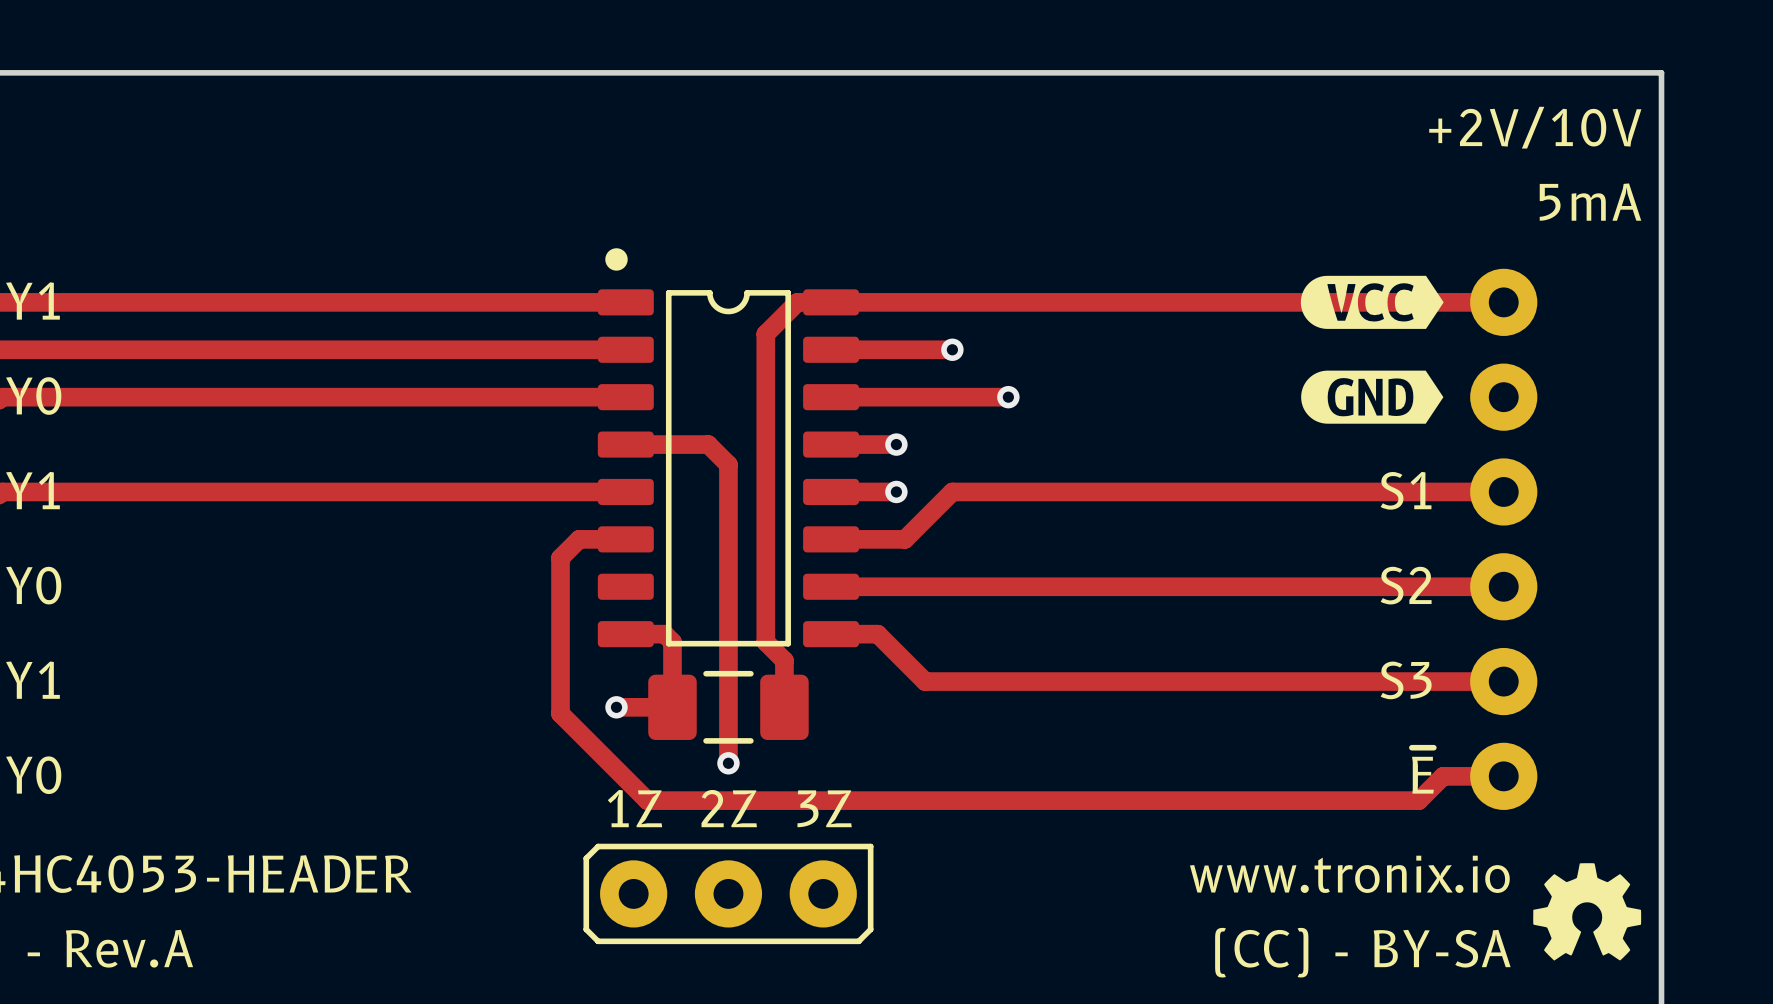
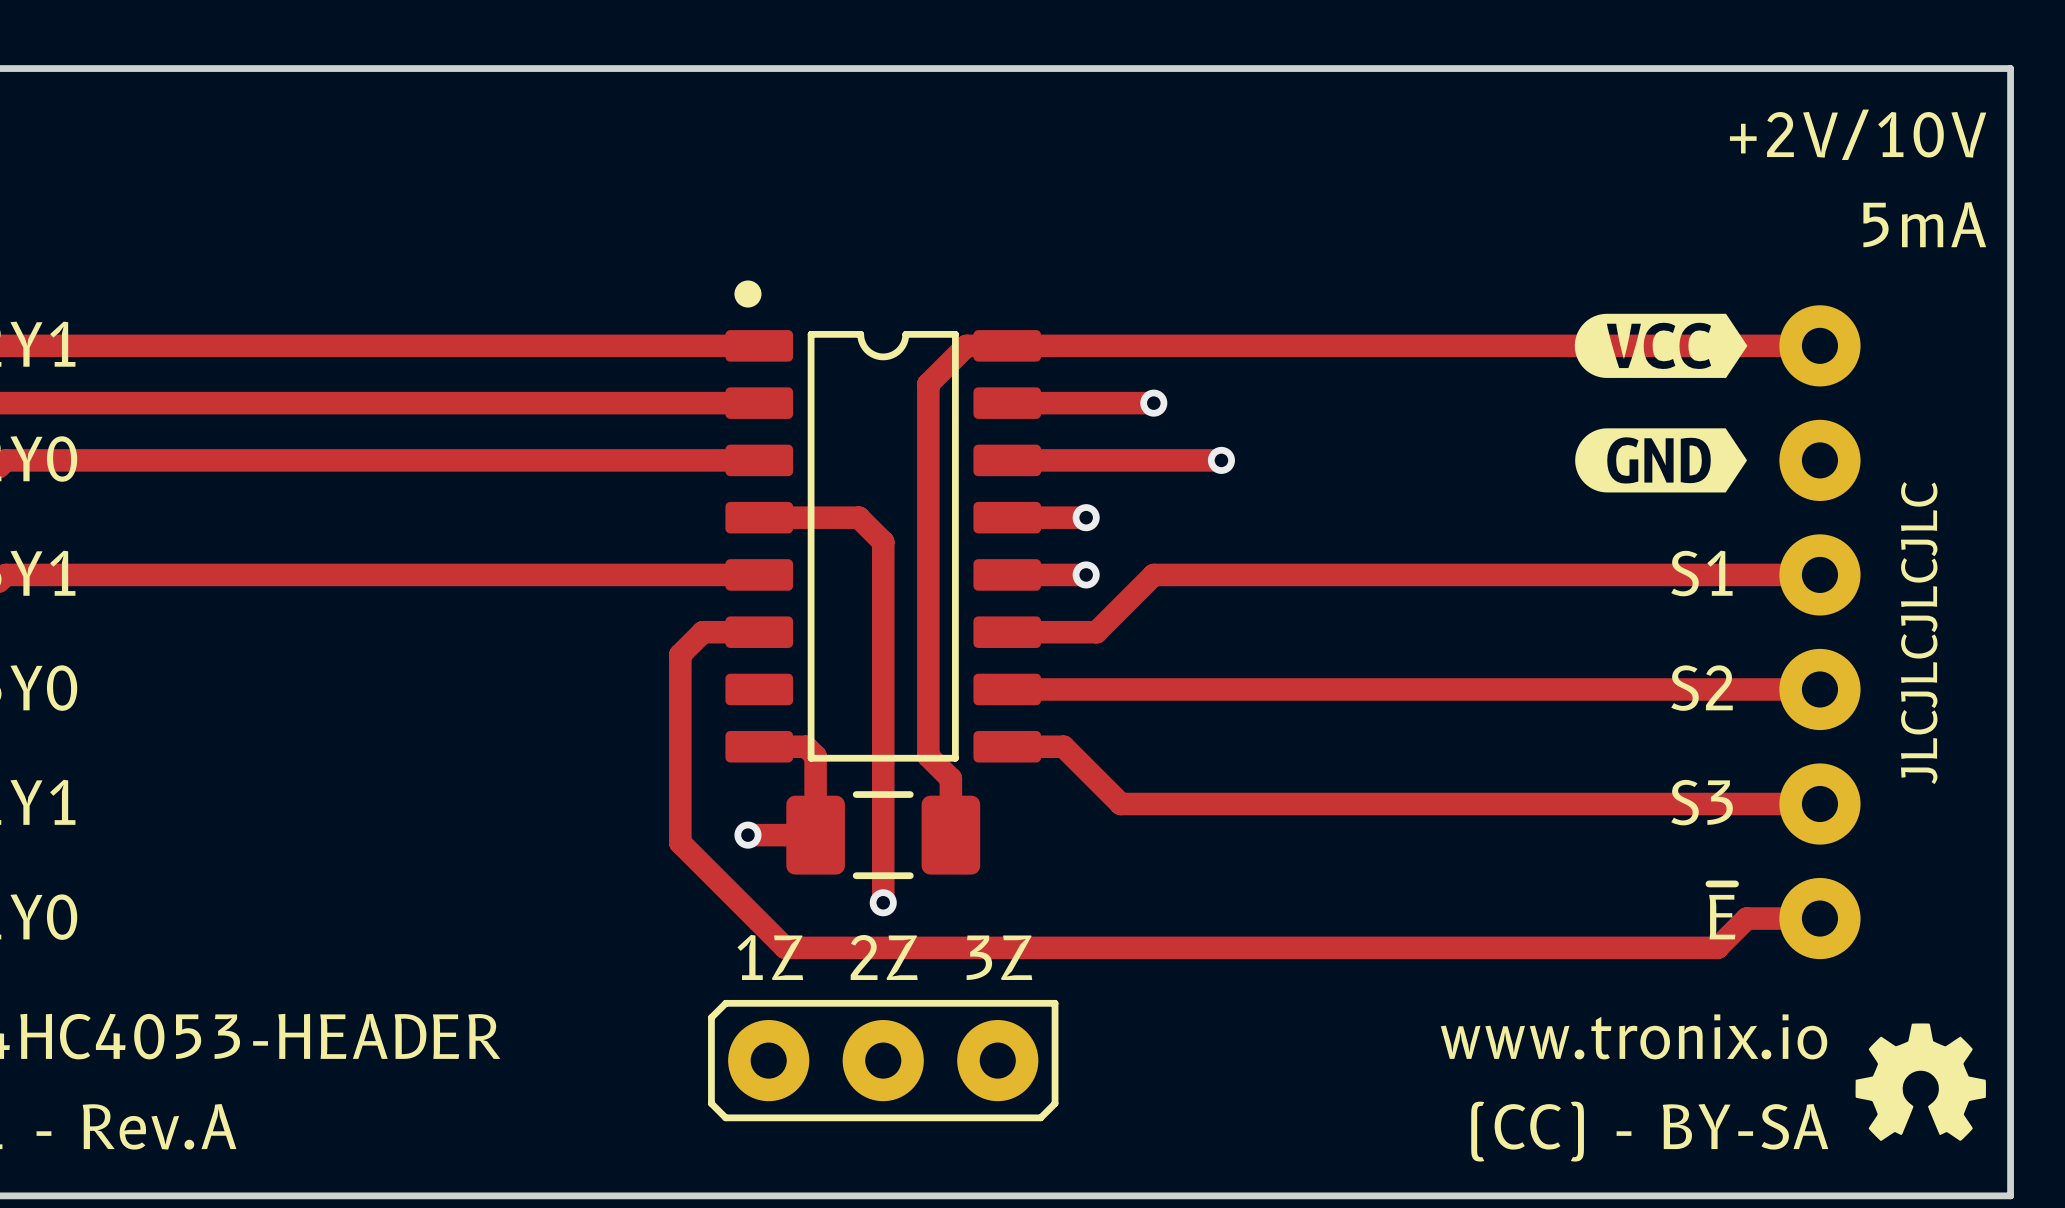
text: none -> JLCJLCJLCJLC (1919, 633)

